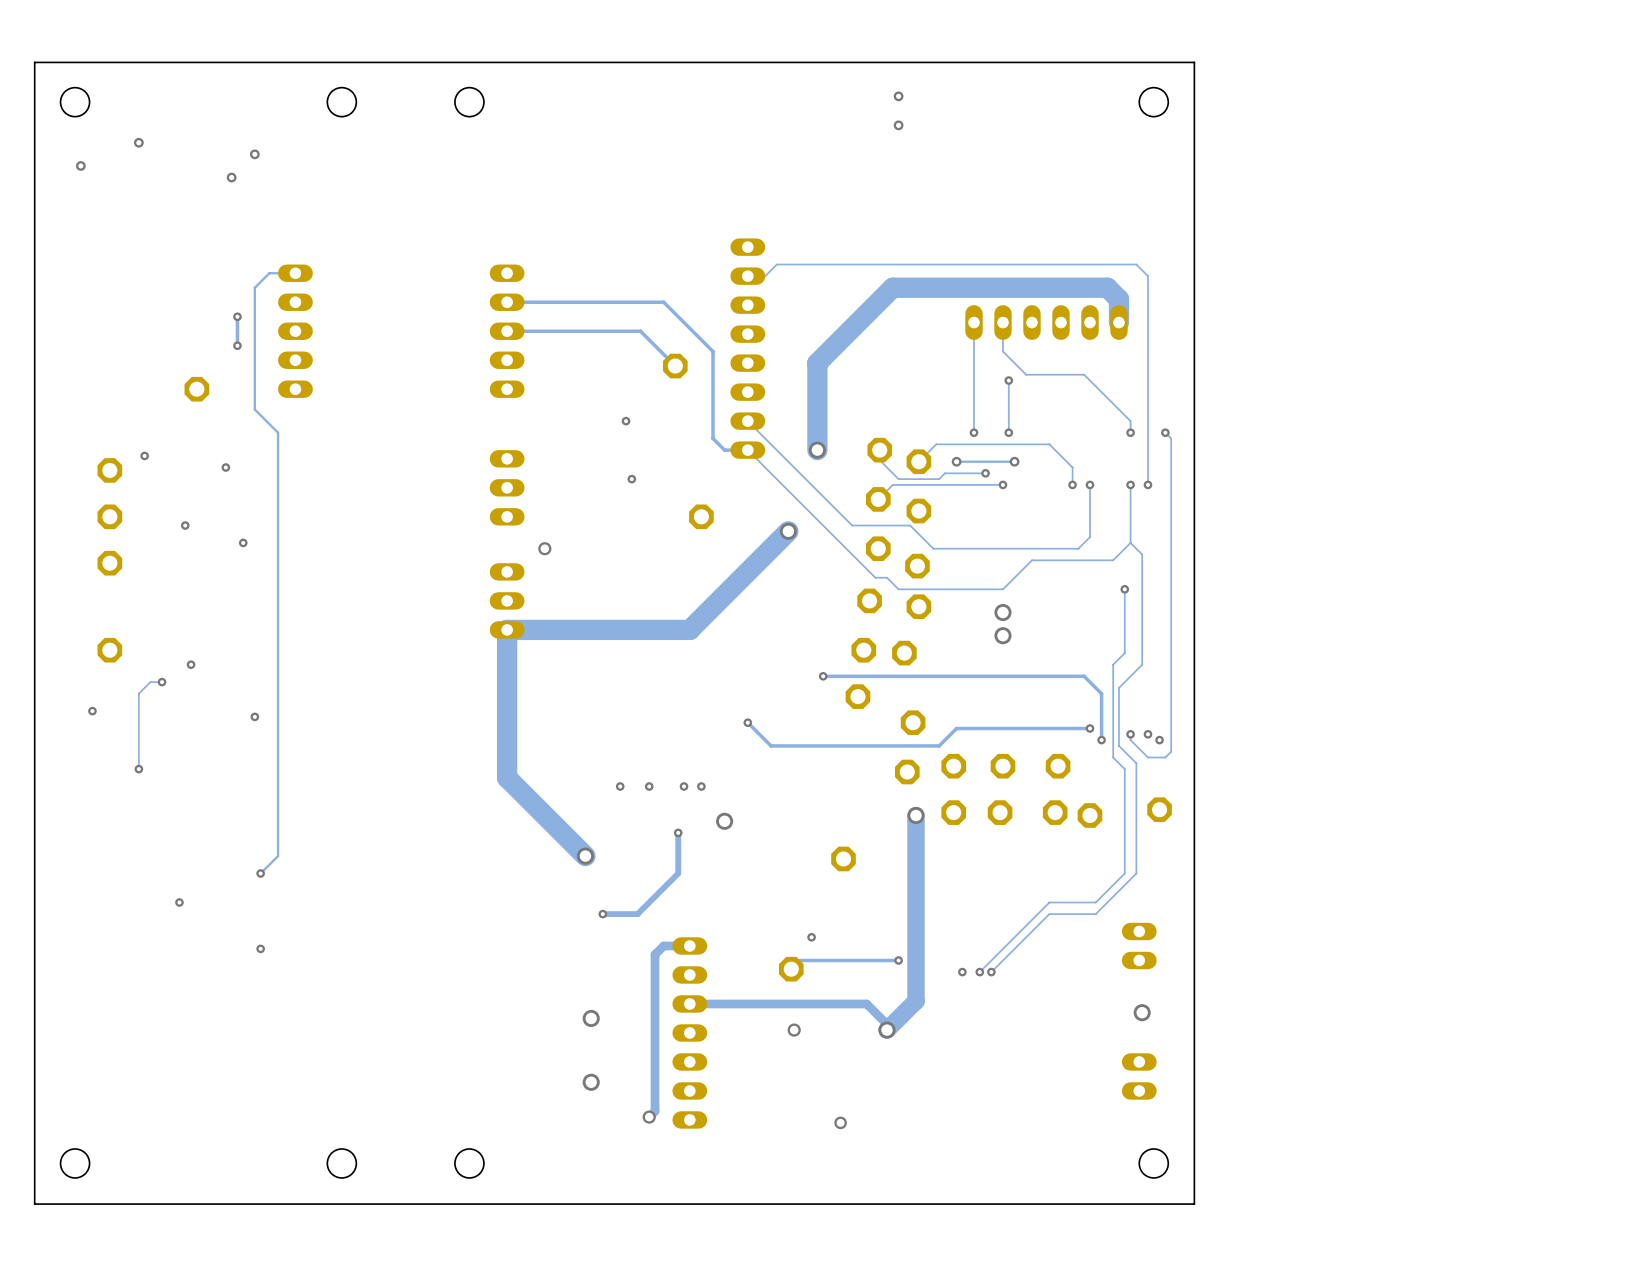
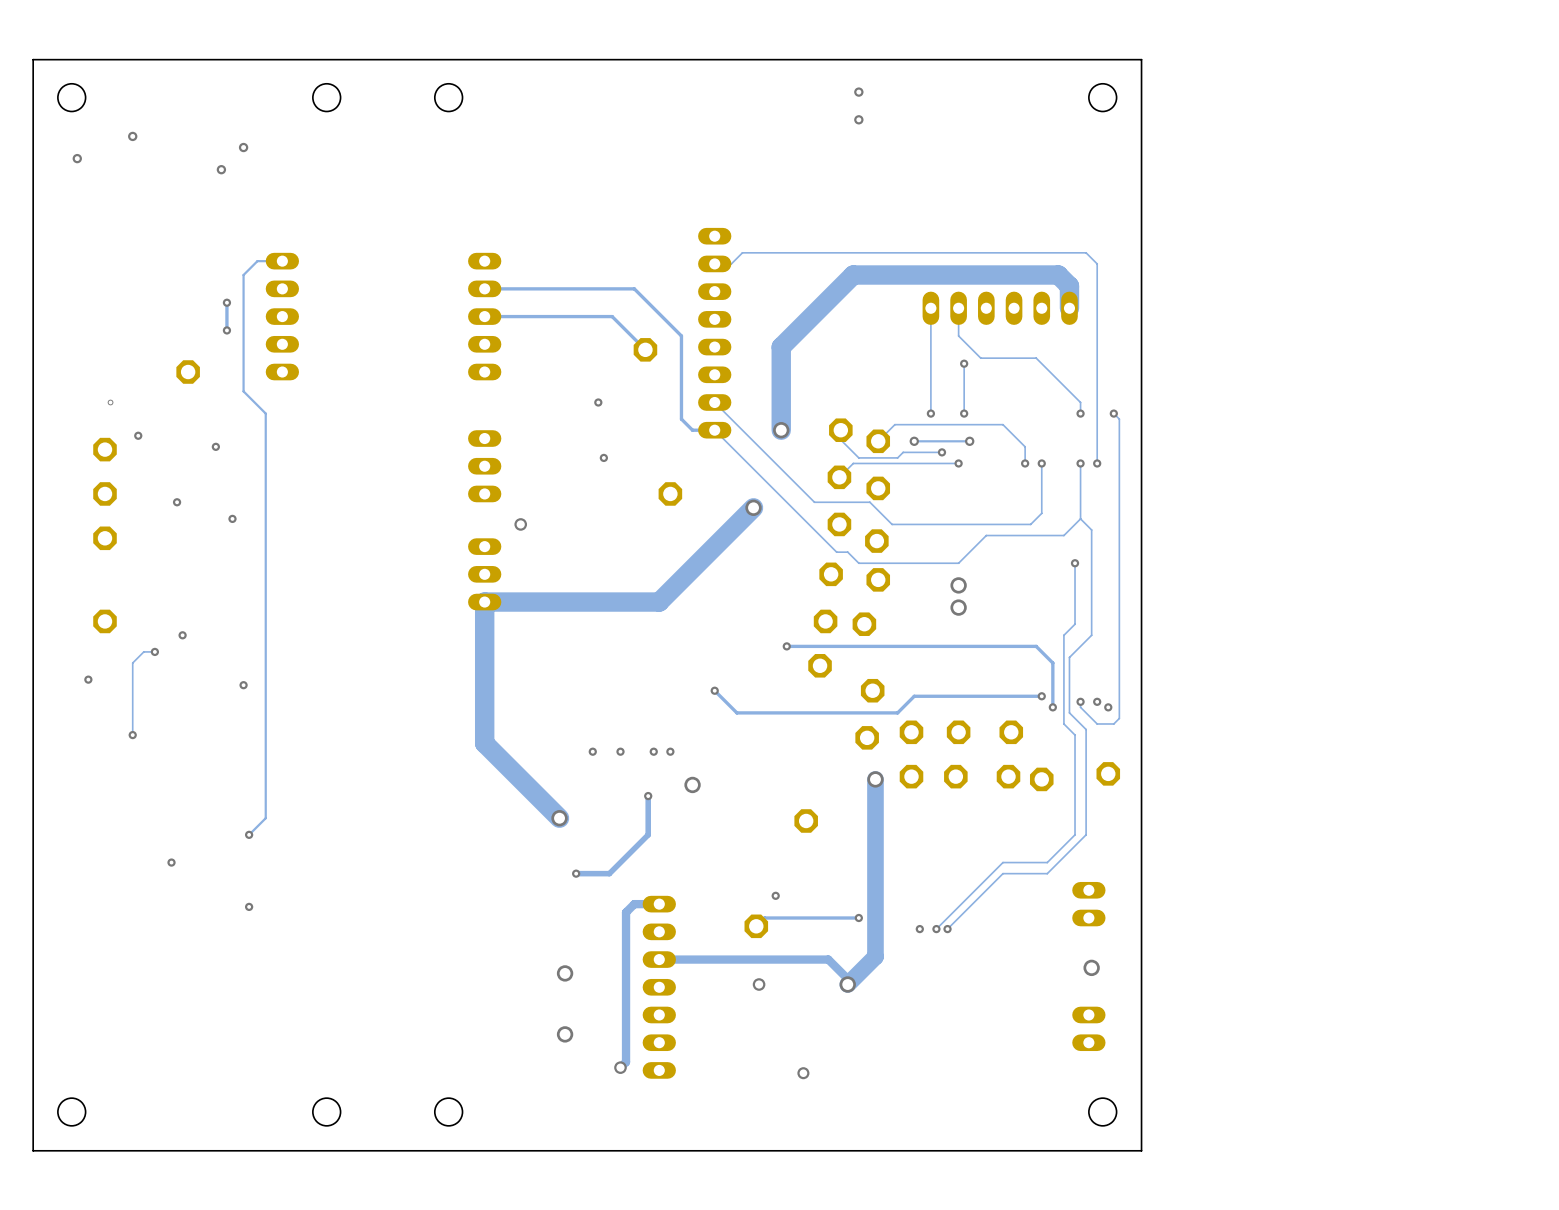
via: none -> (110, 402)

